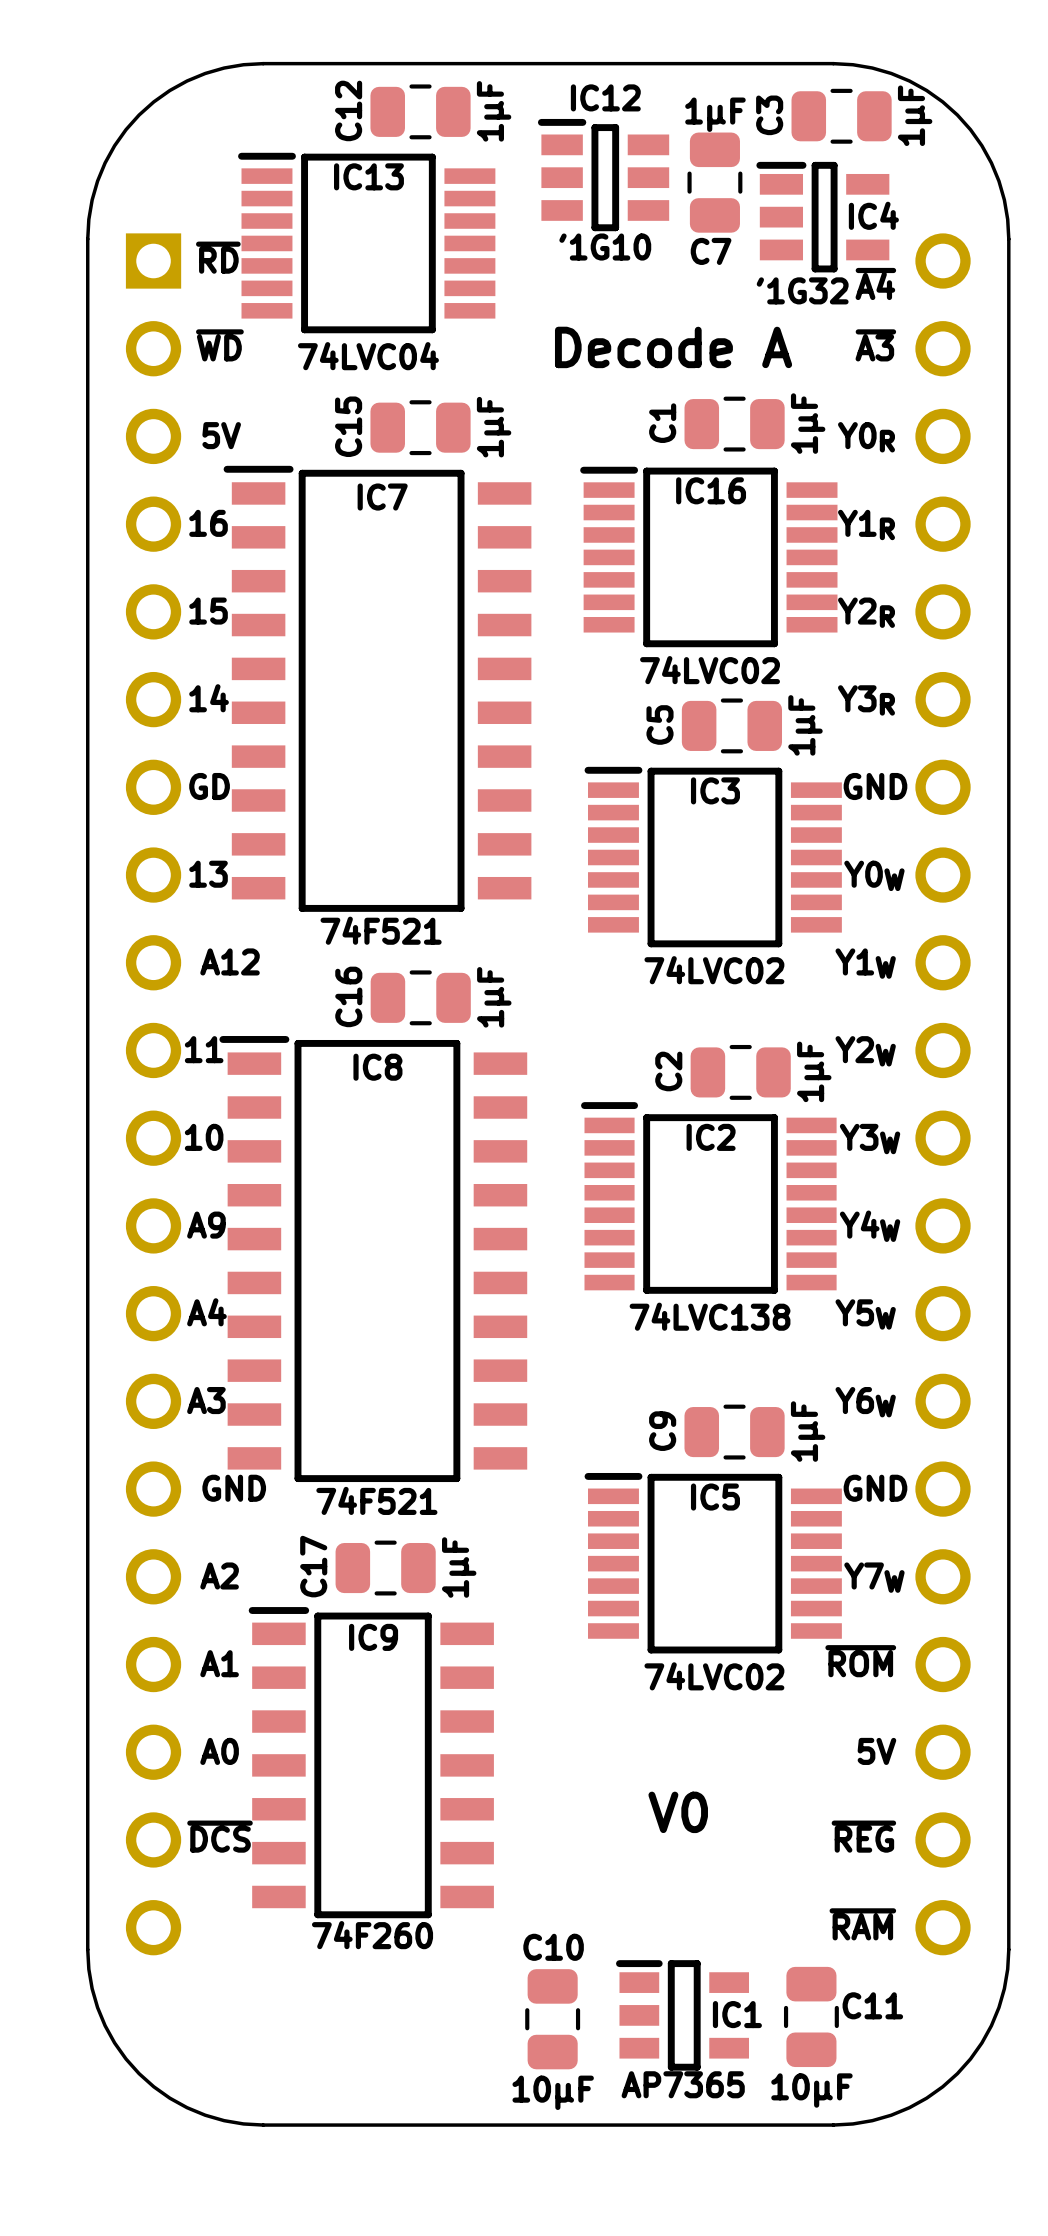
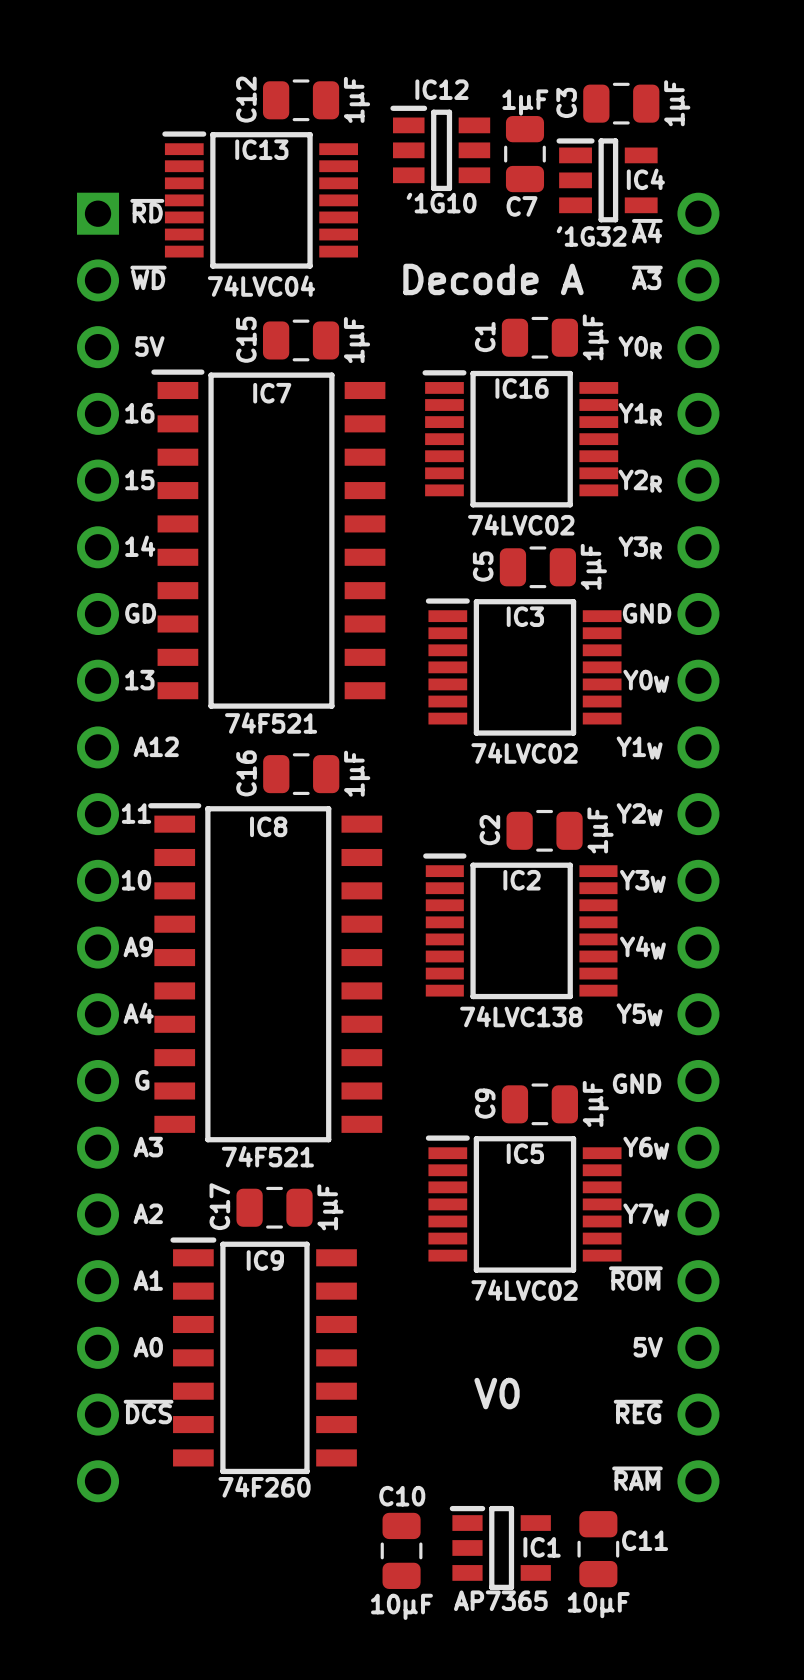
board edge: (263, 63) (853, 64) (891, 73) (909, 81) (942, 101) (970, 129) (981, 145) (998, 181) (1007, 219) (1008, 239) (1008, 1949) (1004, 1988) (998, 2007) (981, 2042) (957, 2073) (942, 2086) (926, 2098) (891, 2115) (853, 2123) (833, 2125) (243, 2123) (205, 2115) (169, 2098) (153, 2086) (139, 2073) (114, 2042) (97, 2007) (92, 1988) (87, 1949) (88, 219) (92, 200) (105, 162) (126, 129) (139, 115) (169, 90) (205, 73) (243, 64) (263, 63) -> none
text: A3 (206, 1400) -> G (142, 1080)
text position: Y6W (865, 1402) -> Y6W (646, 1148)
text: GND (234, 1488) -> A3 (148, 1147)
text position: GND (875, 1488) -> GND (637, 1083)

